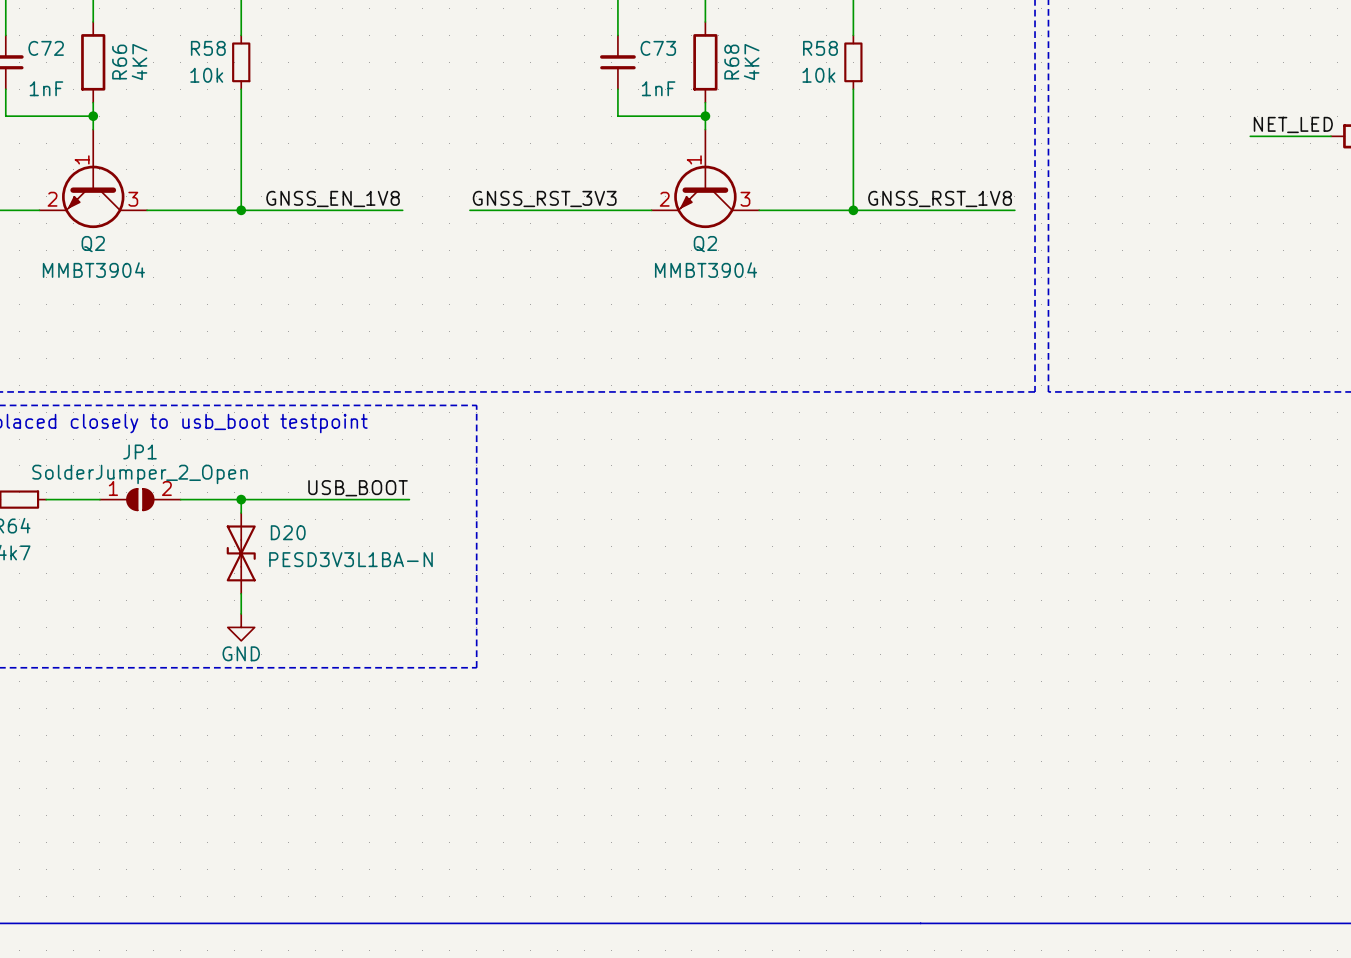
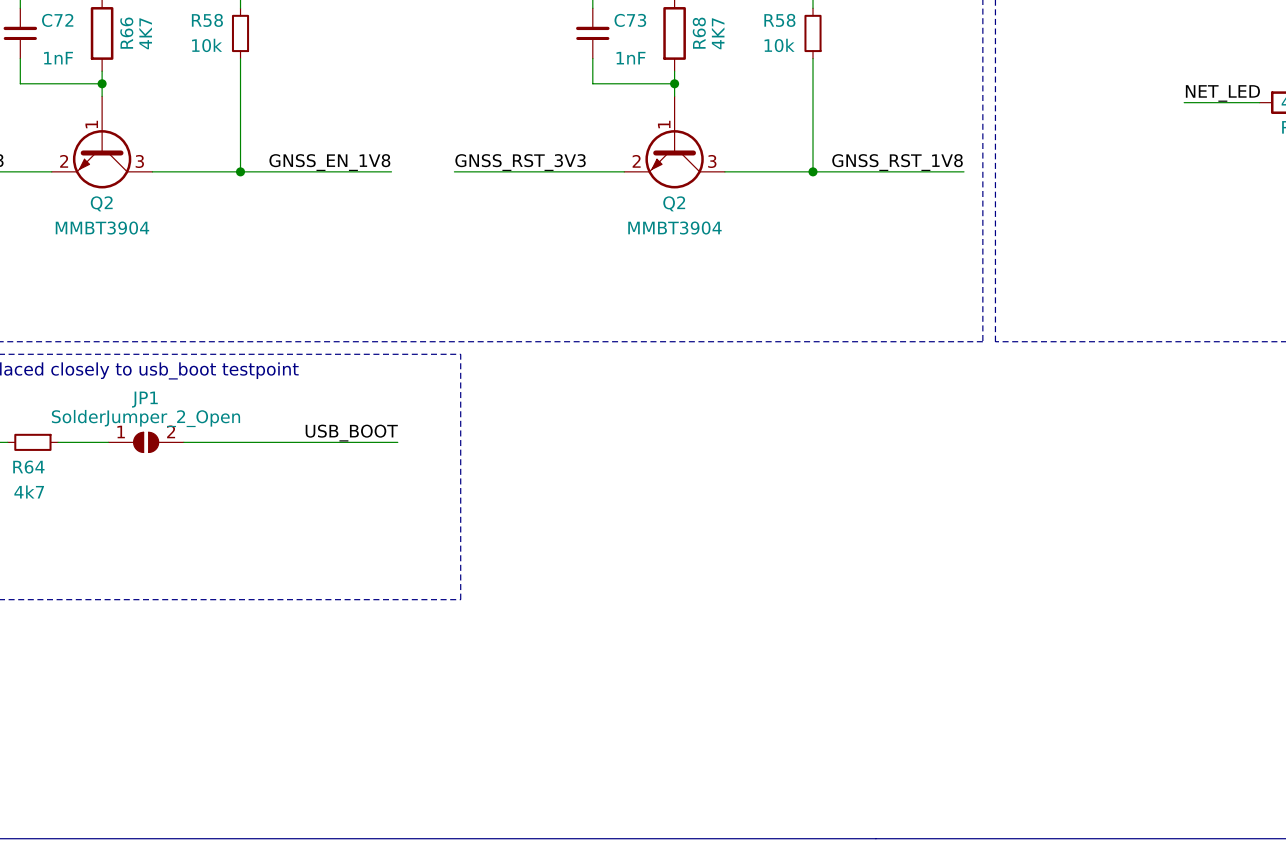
wire: (241, 499) (241, 513) -> none
junction: (241, 499) -> none
D20: PESD3V3L1BA-N (241, 553) -> none
wire: (241, 593) (241, 613) -> none
power symbol: GND (241, 627) -> none

